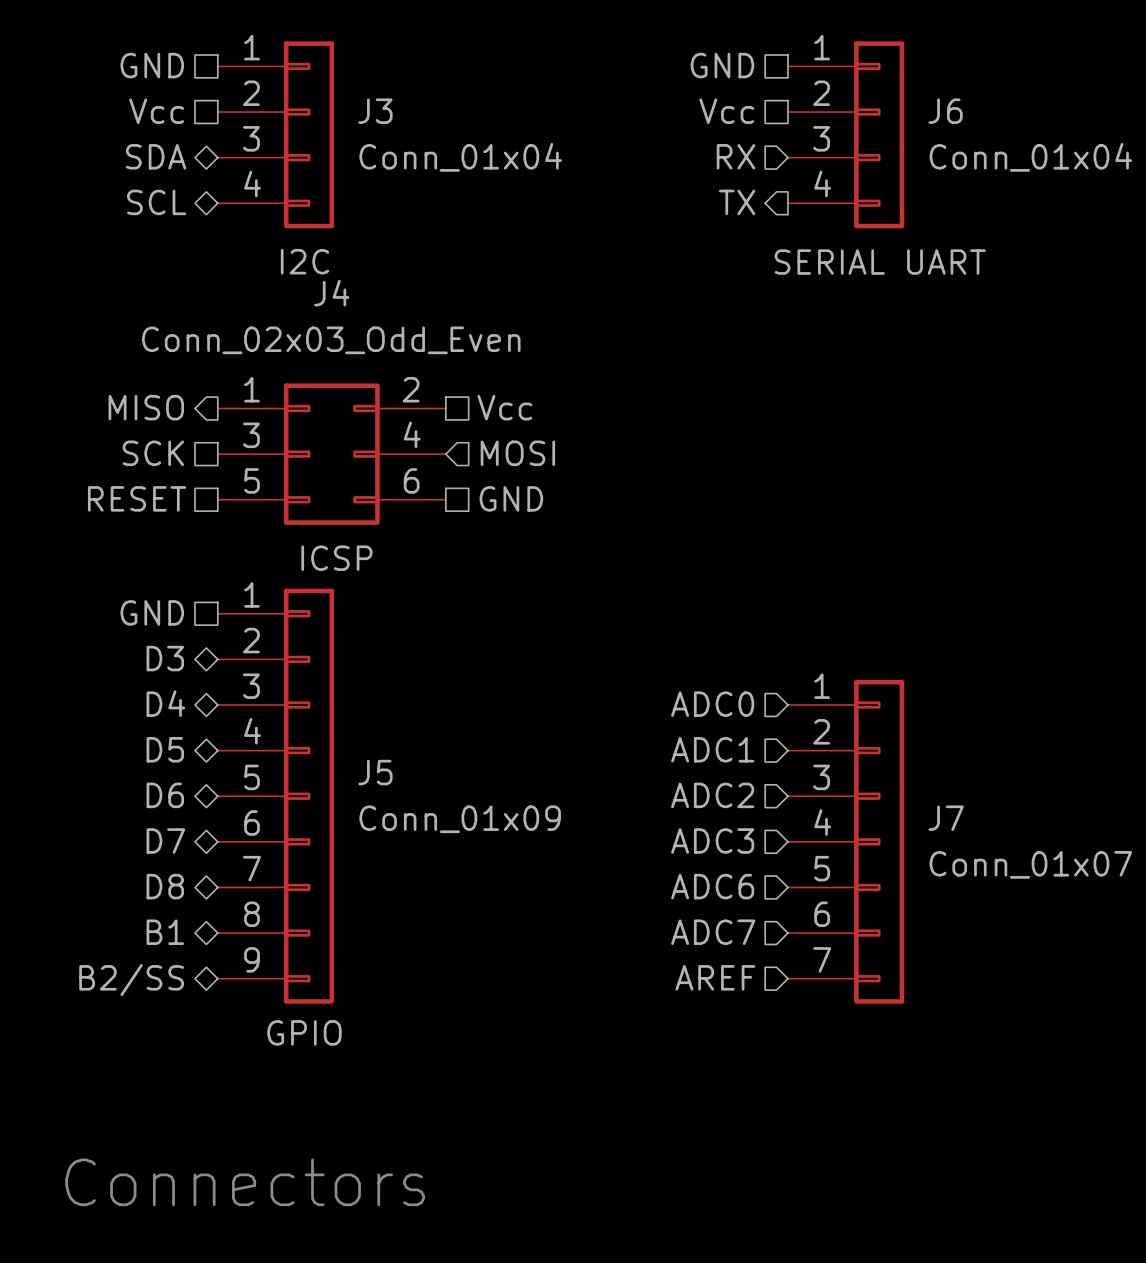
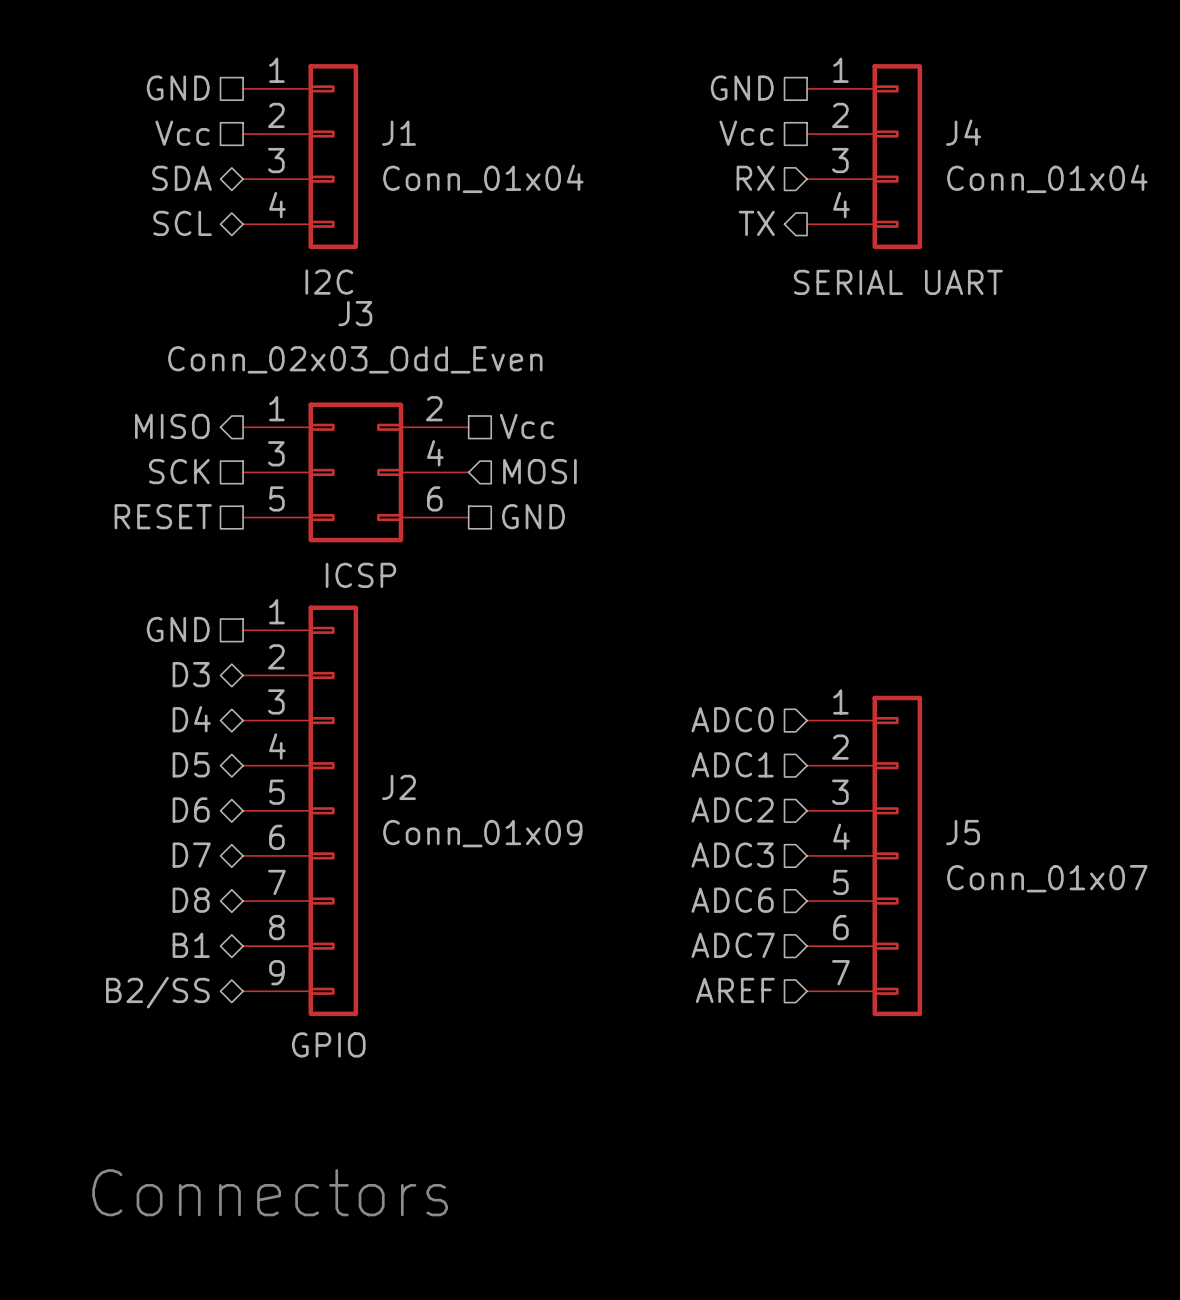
J3 name: J3 (375, 111) -> J1 (399, 133)
J6 name: J6 (945, 111) -> J4 (963, 132)
J4 name: J4 (331, 293) -> J3 (355, 313)
J5 name: J5 (375, 772) -> J2 (399, 787)
J7 name: J7 (946, 818) -> J5 (963, 832)

